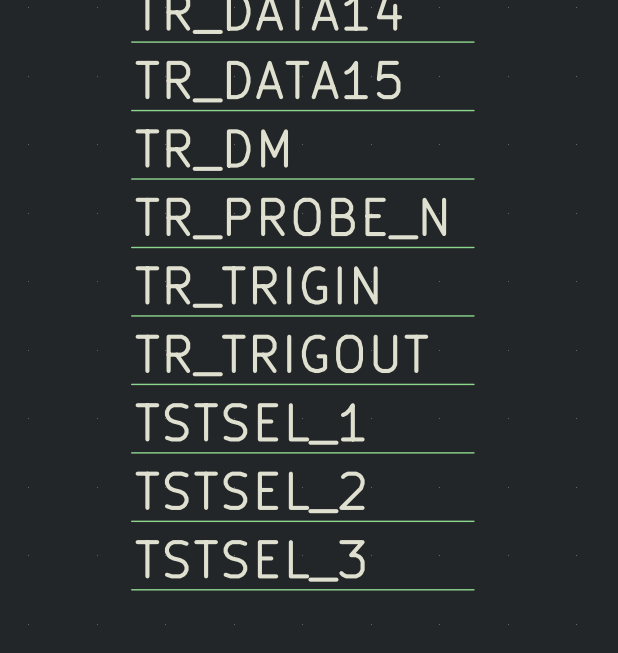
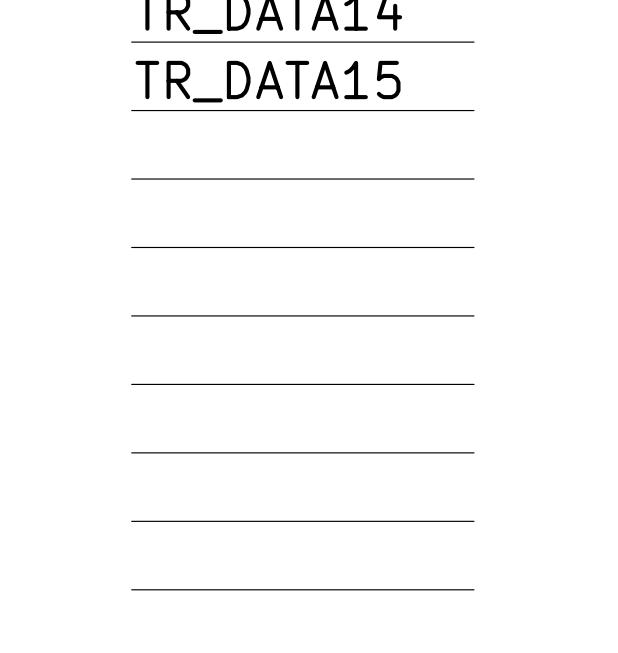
label: TR_DM (211, 150) -> none
label: TR_PROBE_N (290, 218) -> none
label: TR_TRIGIN (256, 287) -> none
label: TR_TRIGOUT (281, 355) -> none
label: TSTSEL_1 (250, 423) -> none
label: TSTSEL_2 (250, 492) -> none
label: TSTSEL_3 (250, 560) -> none

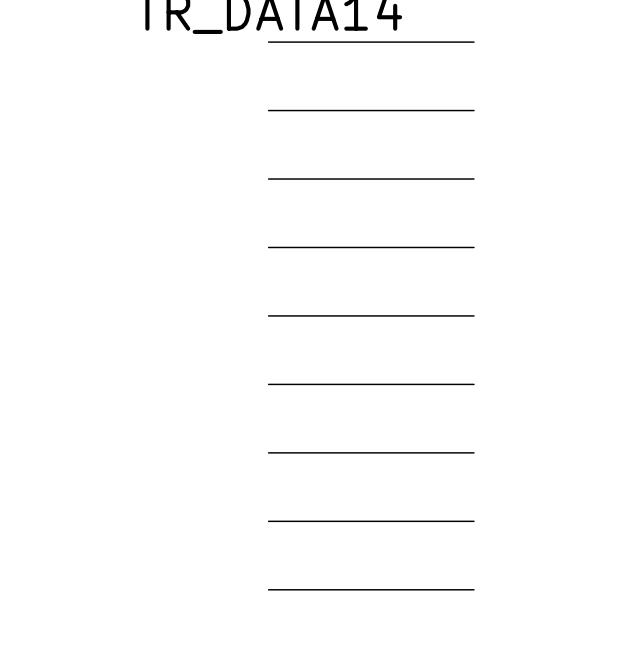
wire: (131, 42) (268, 42) -> none
label: TR_DATA15 (268, 81) -> none
wire: (131, 110) (268, 110) -> none
wire: (131, 179) (268, 179) -> none
wire: (131, 247) (268, 247) -> none
wire: (131, 315) (268, 315) -> none
wire: (131, 384) (268, 384) -> none
wire: (131, 452) (268, 452) -> none
wire: (131, 521) (268, 521) -> none
wire: (131, 589) (268, 589) -> none

